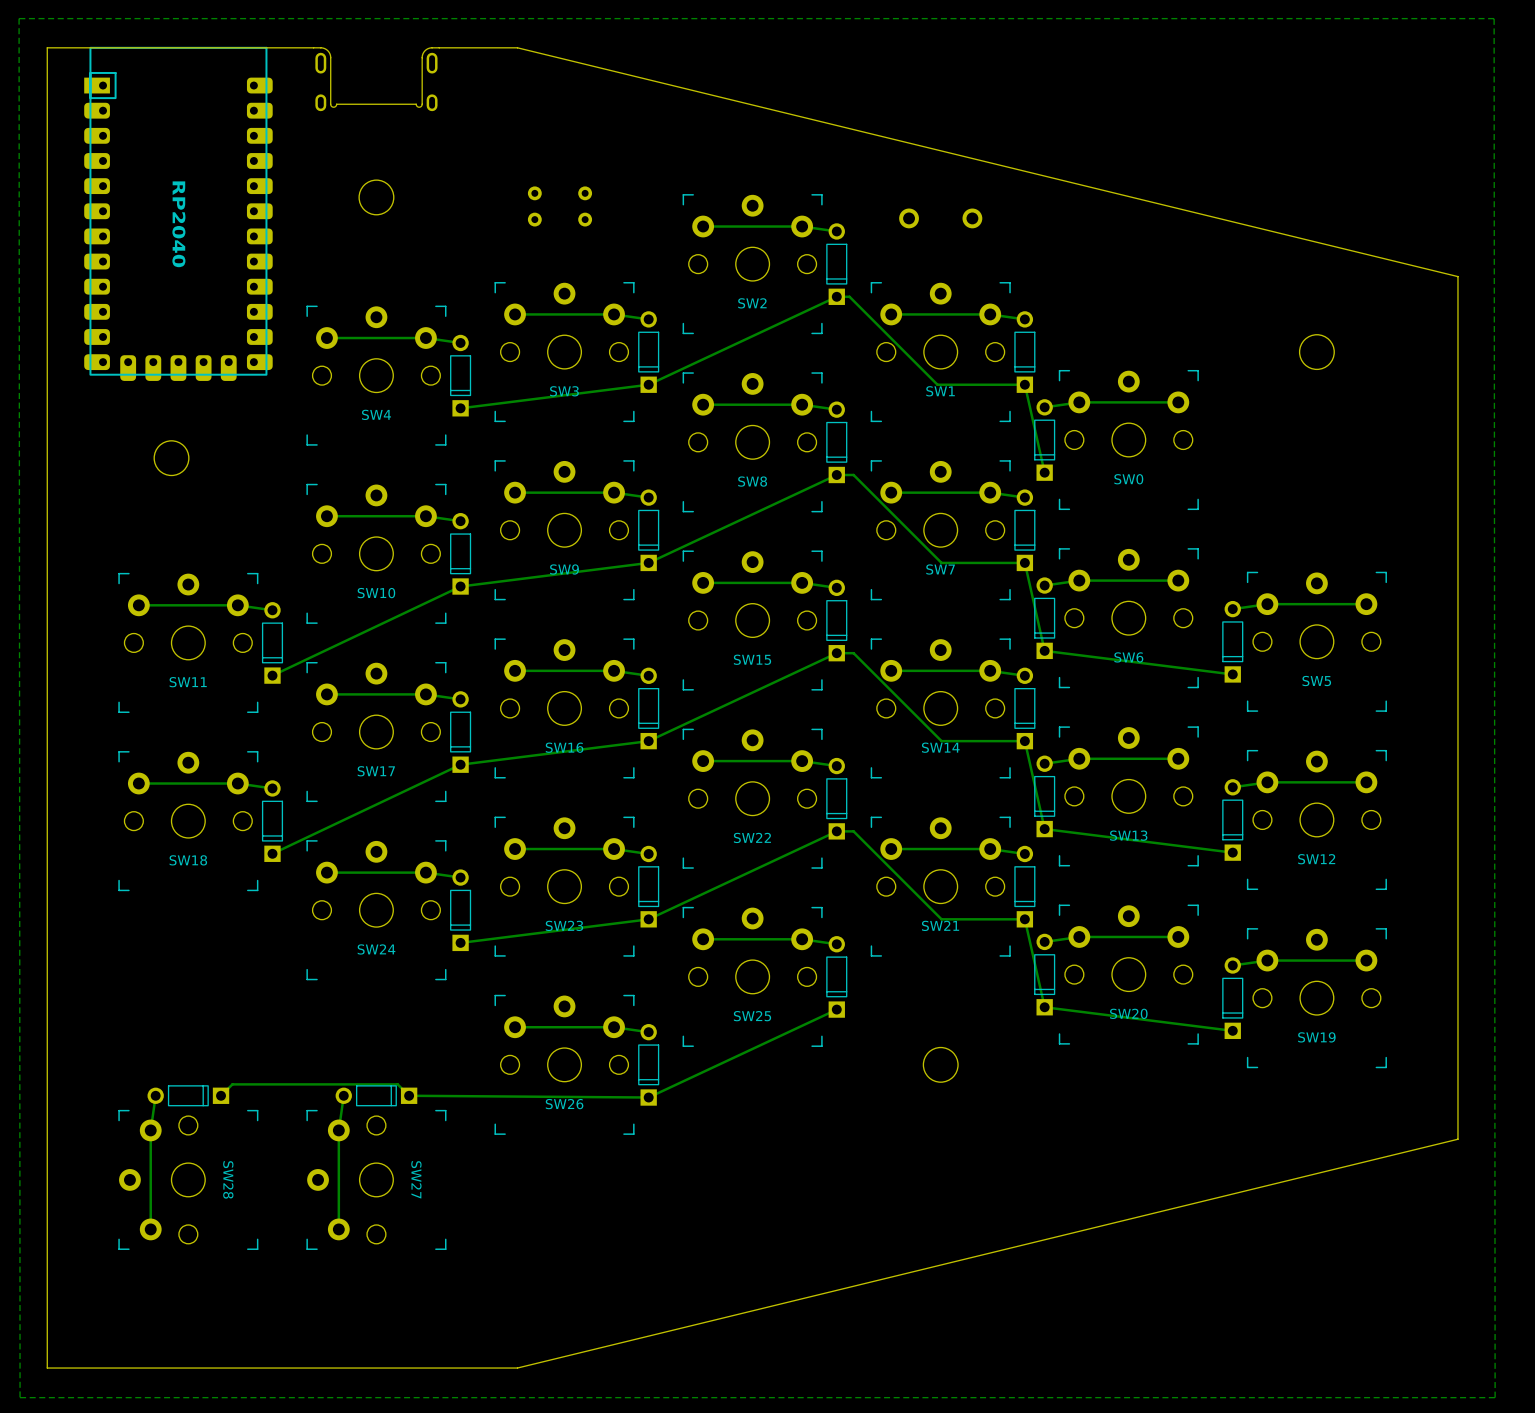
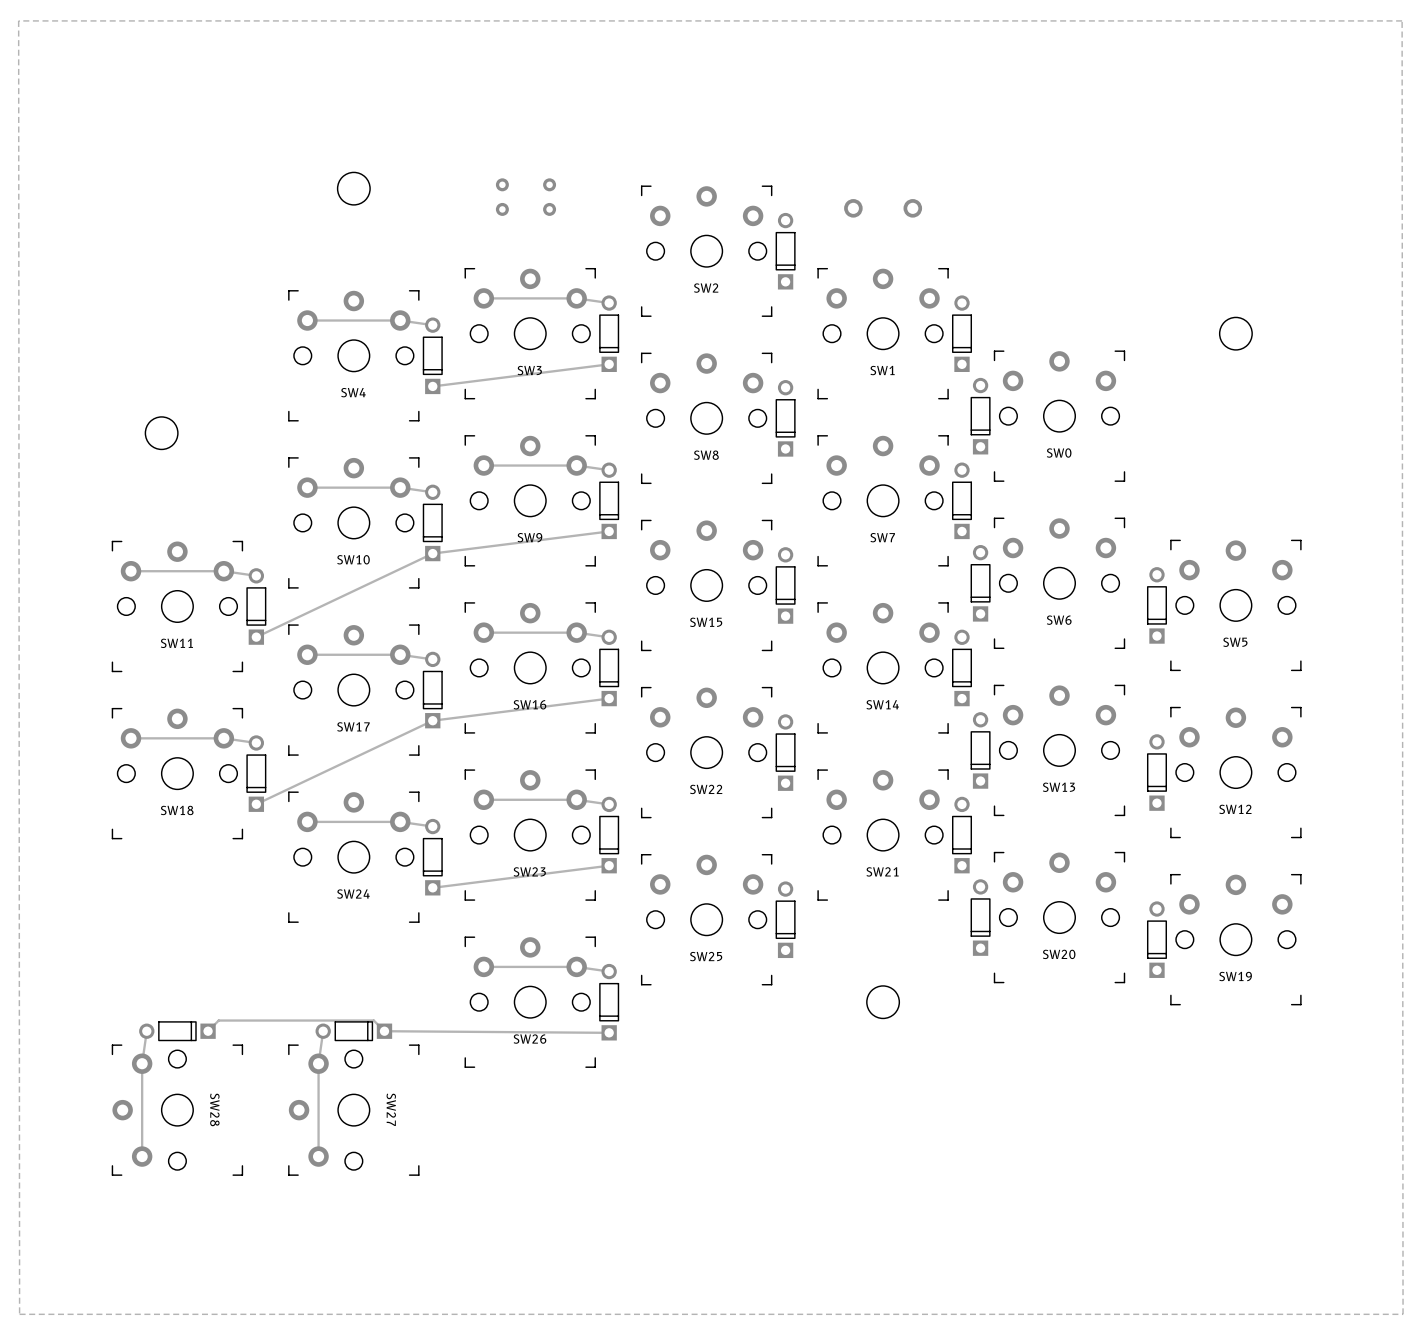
board edge: (439, 47) (517, 47) (1457, 276) (1457, 1139) (517, 1368) (47, 1368) (47, 47) (313, 47) -> none
part: (376, 79) -> none
part: RP2040 (178, 213) -> none
track: (703, 226) (802, 226) (836, 231) -> none
track: (891, 314) (990, 314) (1024, 319) -> none
track: (648, 384) (836, 296) (849, 296) (937, 384) (1024, 384) (1044, 472) -> none
track: (1178, 402) (1079, 402) (1044, 407) -> none
track: (703, 404) (802, 404) (836, 409) -> none
track: (891, 492) (990, 492) (1024, 497) -> none
track: (648, 562) (836, 474) (853, 474) (941, 562) (1024, 562) (1044, 650) (1232, 674) -> none
track: (1178, 580) (1079, 580) (1044, 585) -> none
track: (703, 582) (802, 582) (836, 587) -> none
track: (1366, 604) (1267, 604) (1232, 609) -> none
track: (891, 670) (990, 670) (1024, 675) -> none
track: (648, 741) (836, 653) (853, 653) (941, 741) (1024, 741) (1044, 829) (1232, 852) -> none
track: (1178, 758) (1079, 758) (1044, 763) -> none
track: (703, 761) (802, 761) (836, 766) -> none
track: (1366, 782) (1267, 782) (1232, 787) -> none
track: (891, 849) (990, 849) (1024, 853) -> none
track: (648, 919) (836, 831) (853, 831) (941, 919) (1024, 919) (1044, 1007) (1232, 1030) -> none
track: (1178, 936) (1079, 936) (1044, 941) -> none
track: (703, 939) (802, 939) (836, 944) -> none
track: (1366, 960) (1267, 960) (1232, 965) -> none
track: (836, 1009) (648, 1097) -> none

